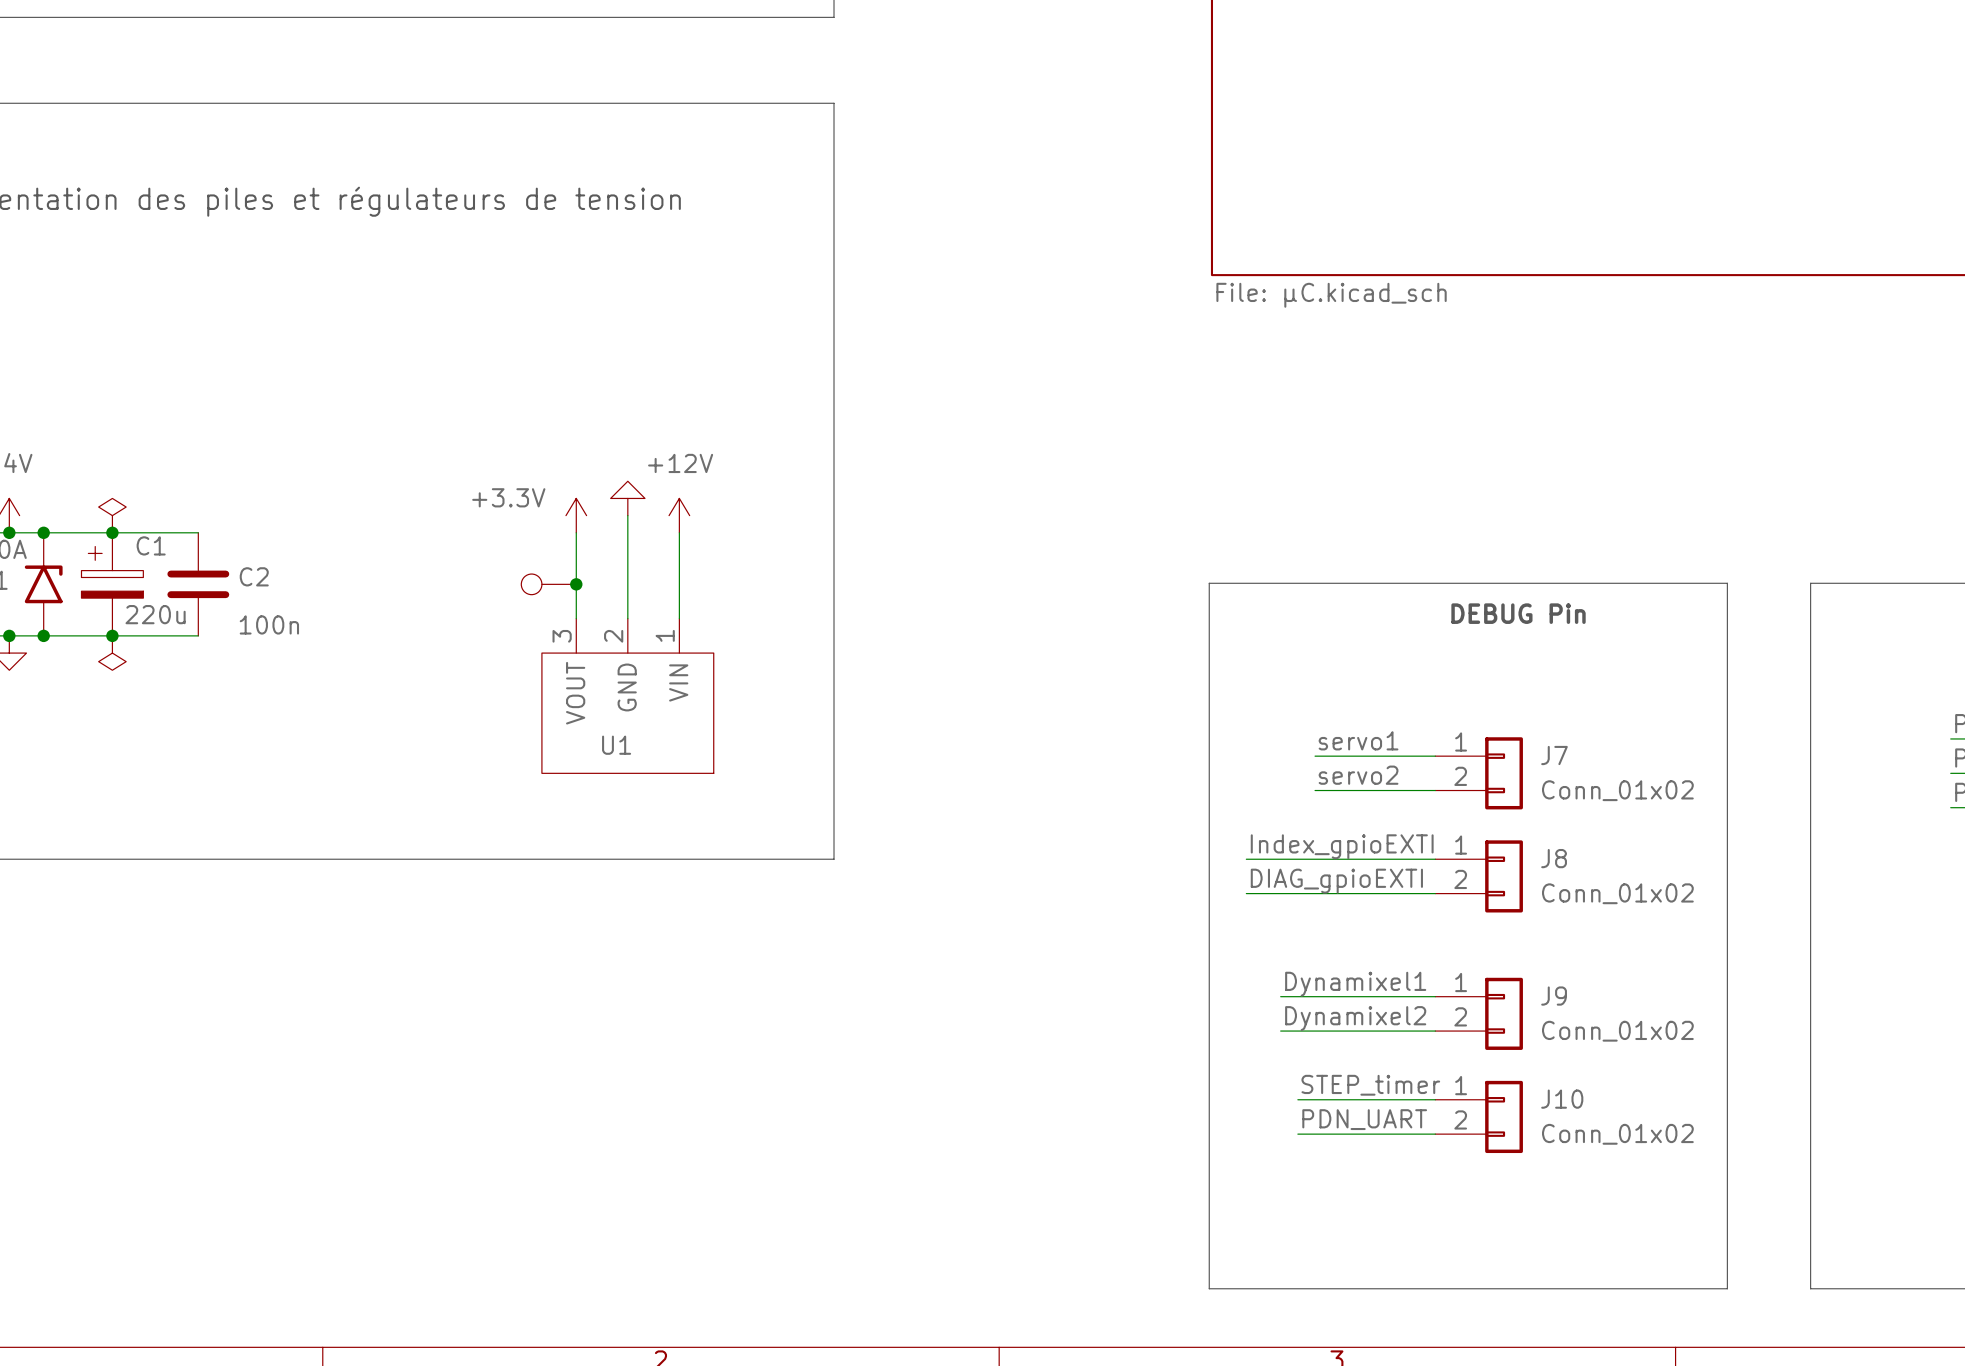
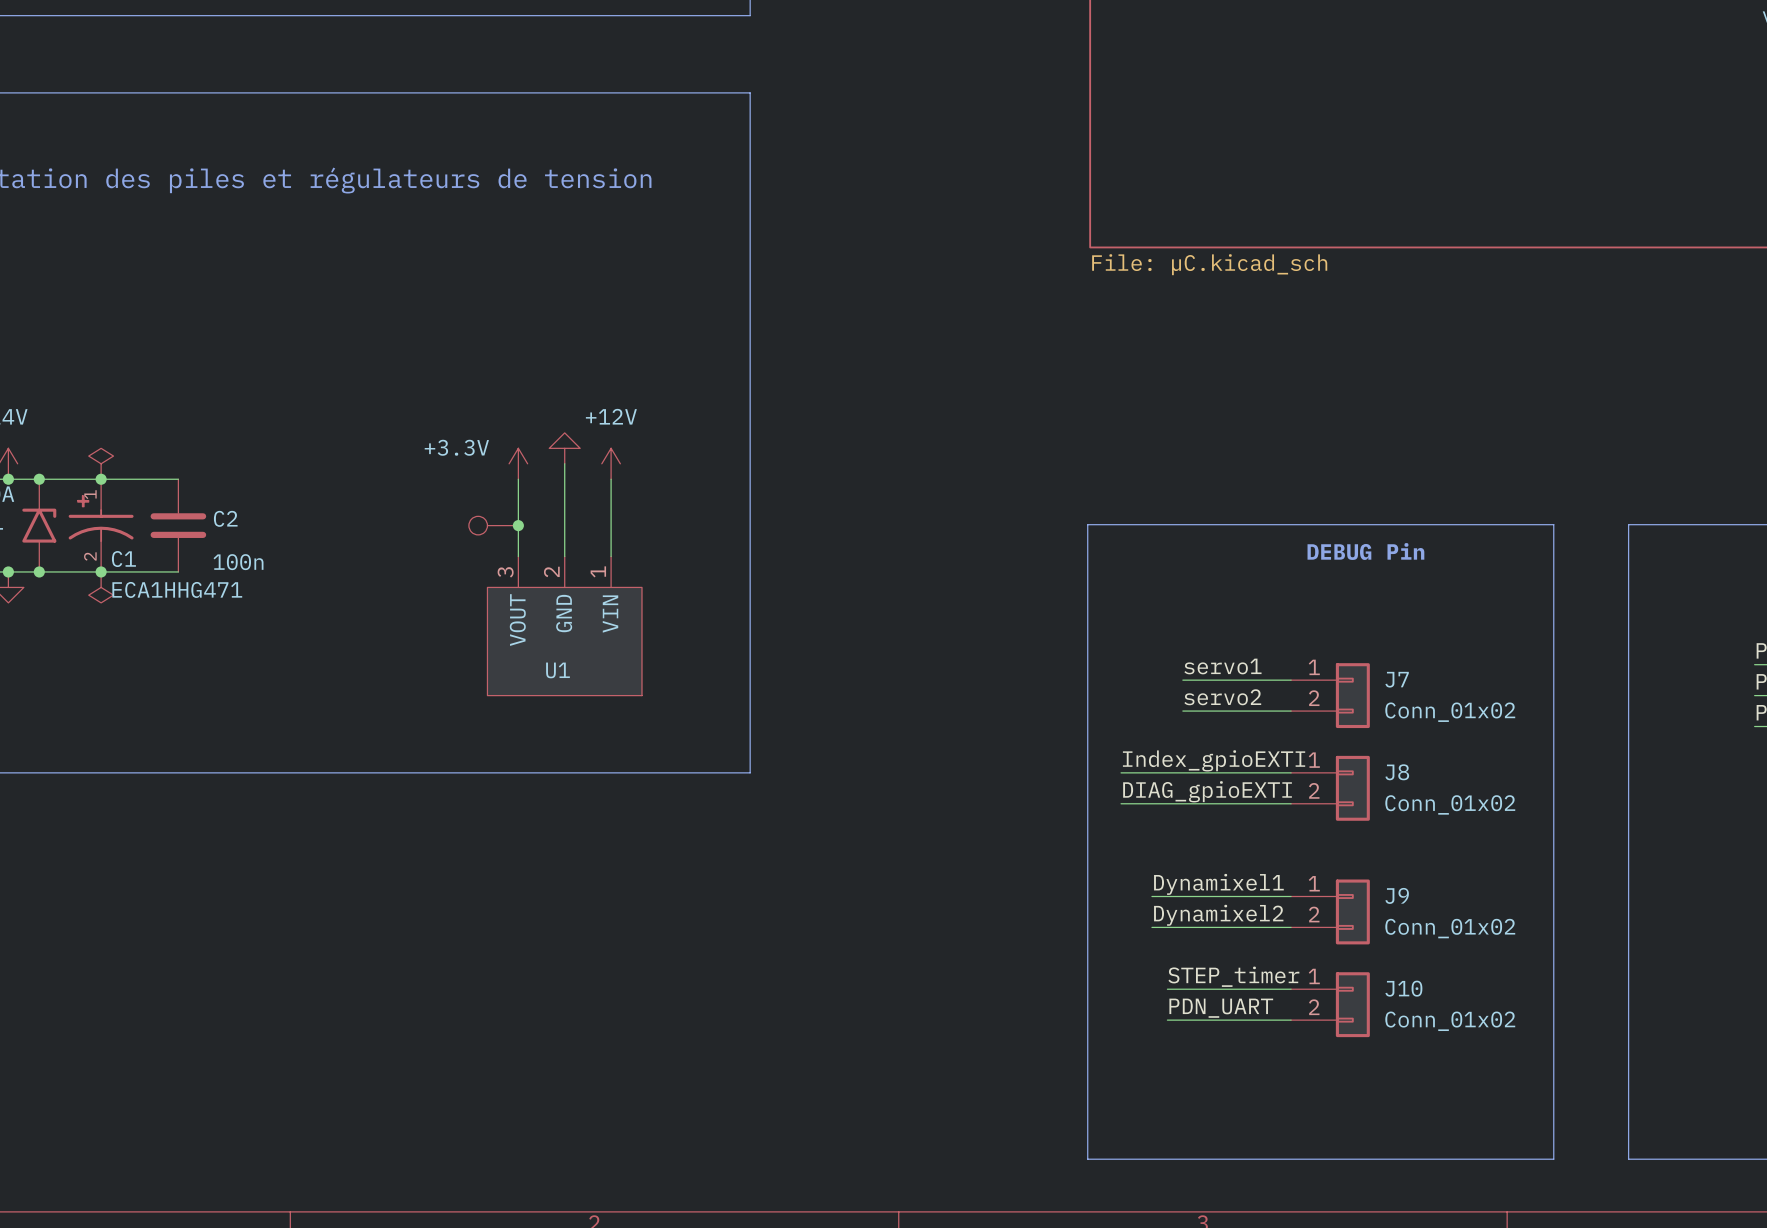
C1 symbol: [81, 532, 144, 636] -> [68, 479, 134, 572]
C1 name position: C1 (151, 545) -> C1 (123, 559)
C1 value: 220u (155, 614) -> ECA1HHG471 (177, 589)

